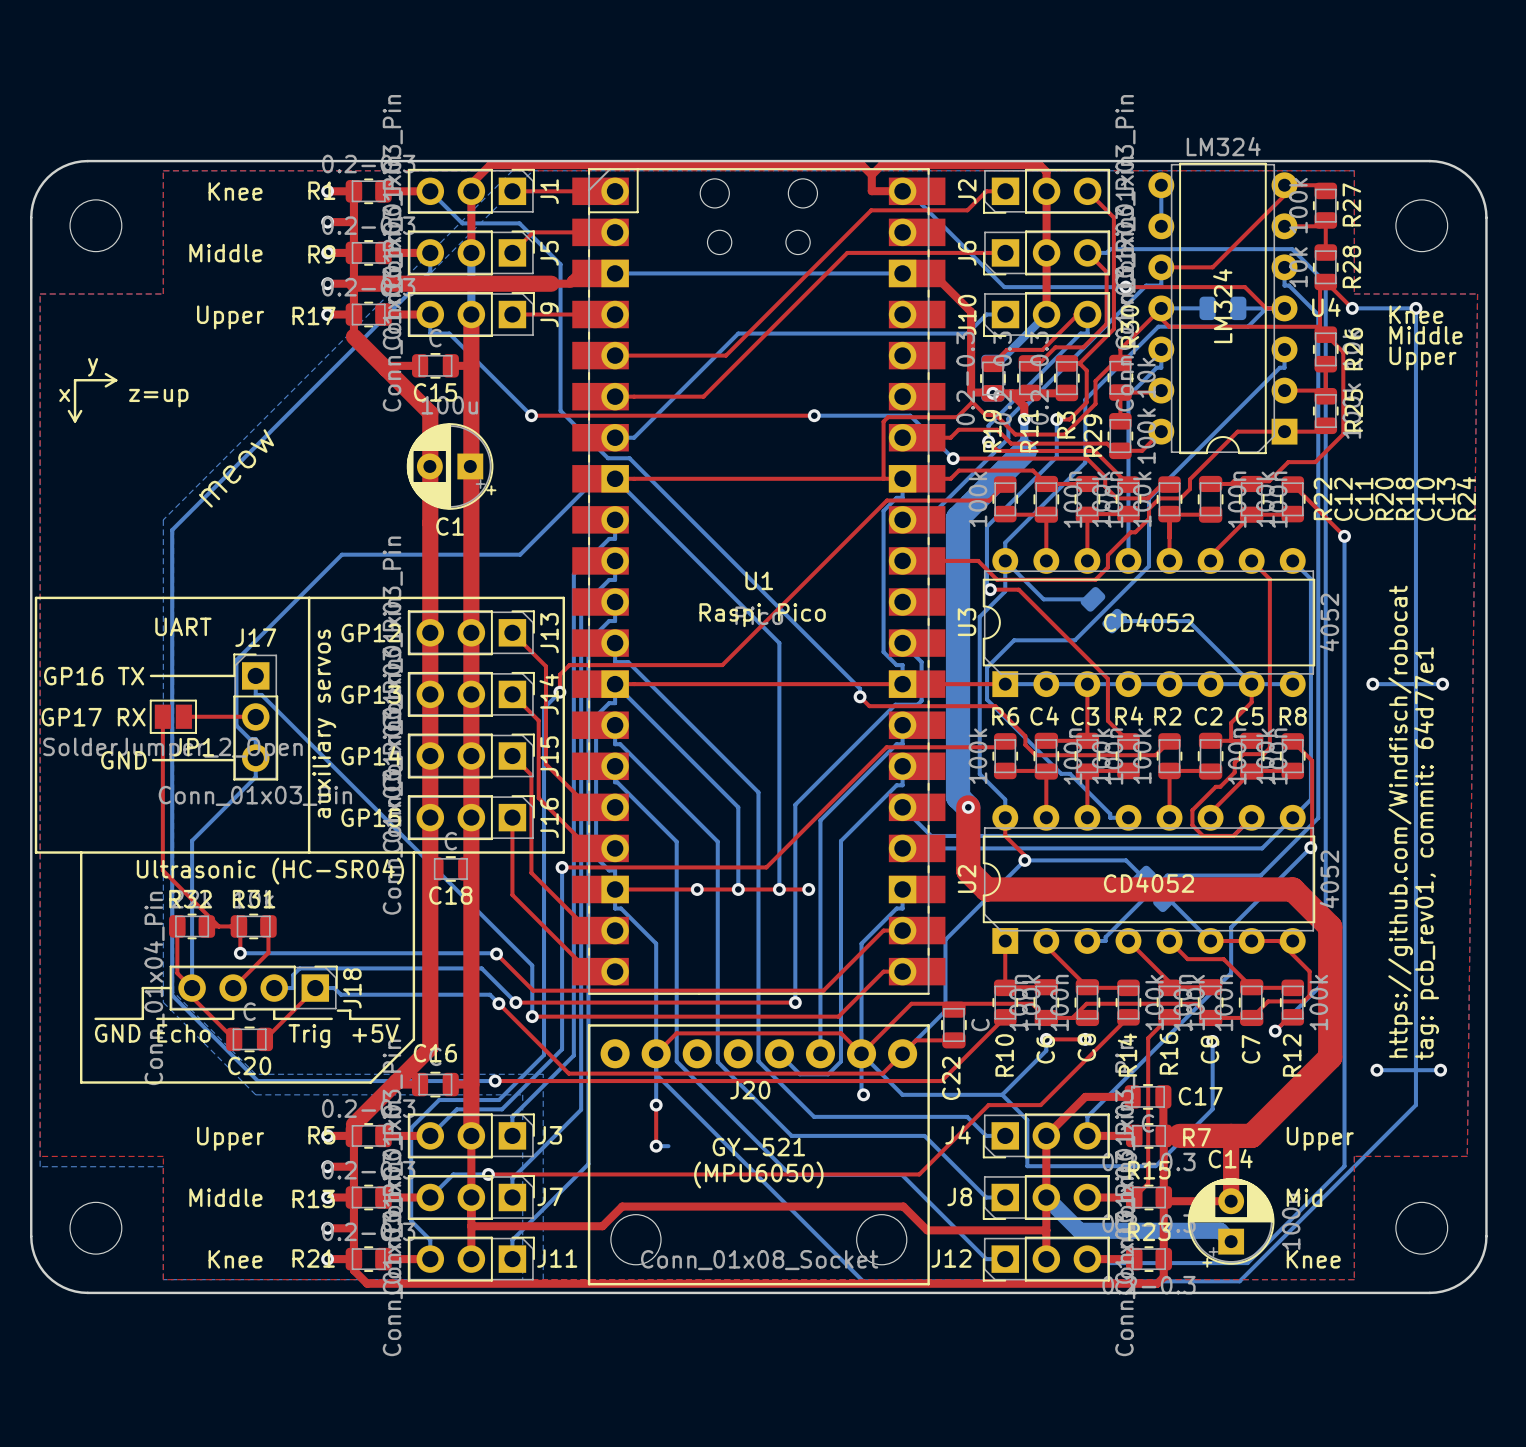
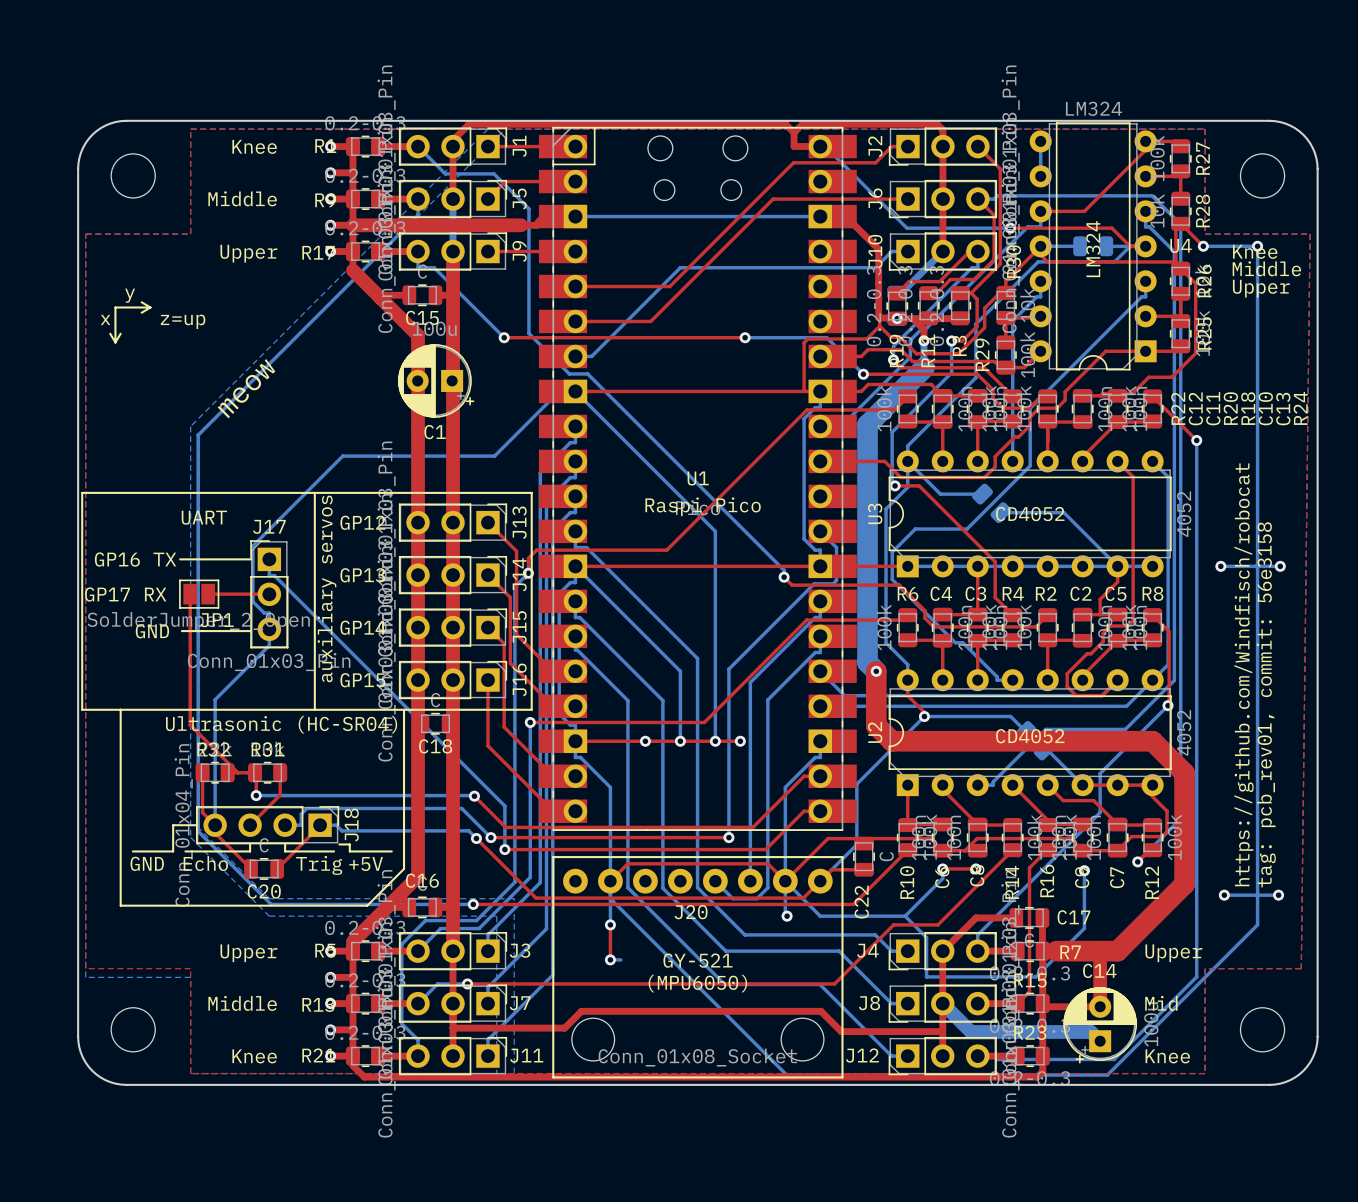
text: tag: pcb_rev01, commit: 64d77e1 (1426, 853) -> tag: pcb_rev01, commit: 56e3158 (1266, 704)

